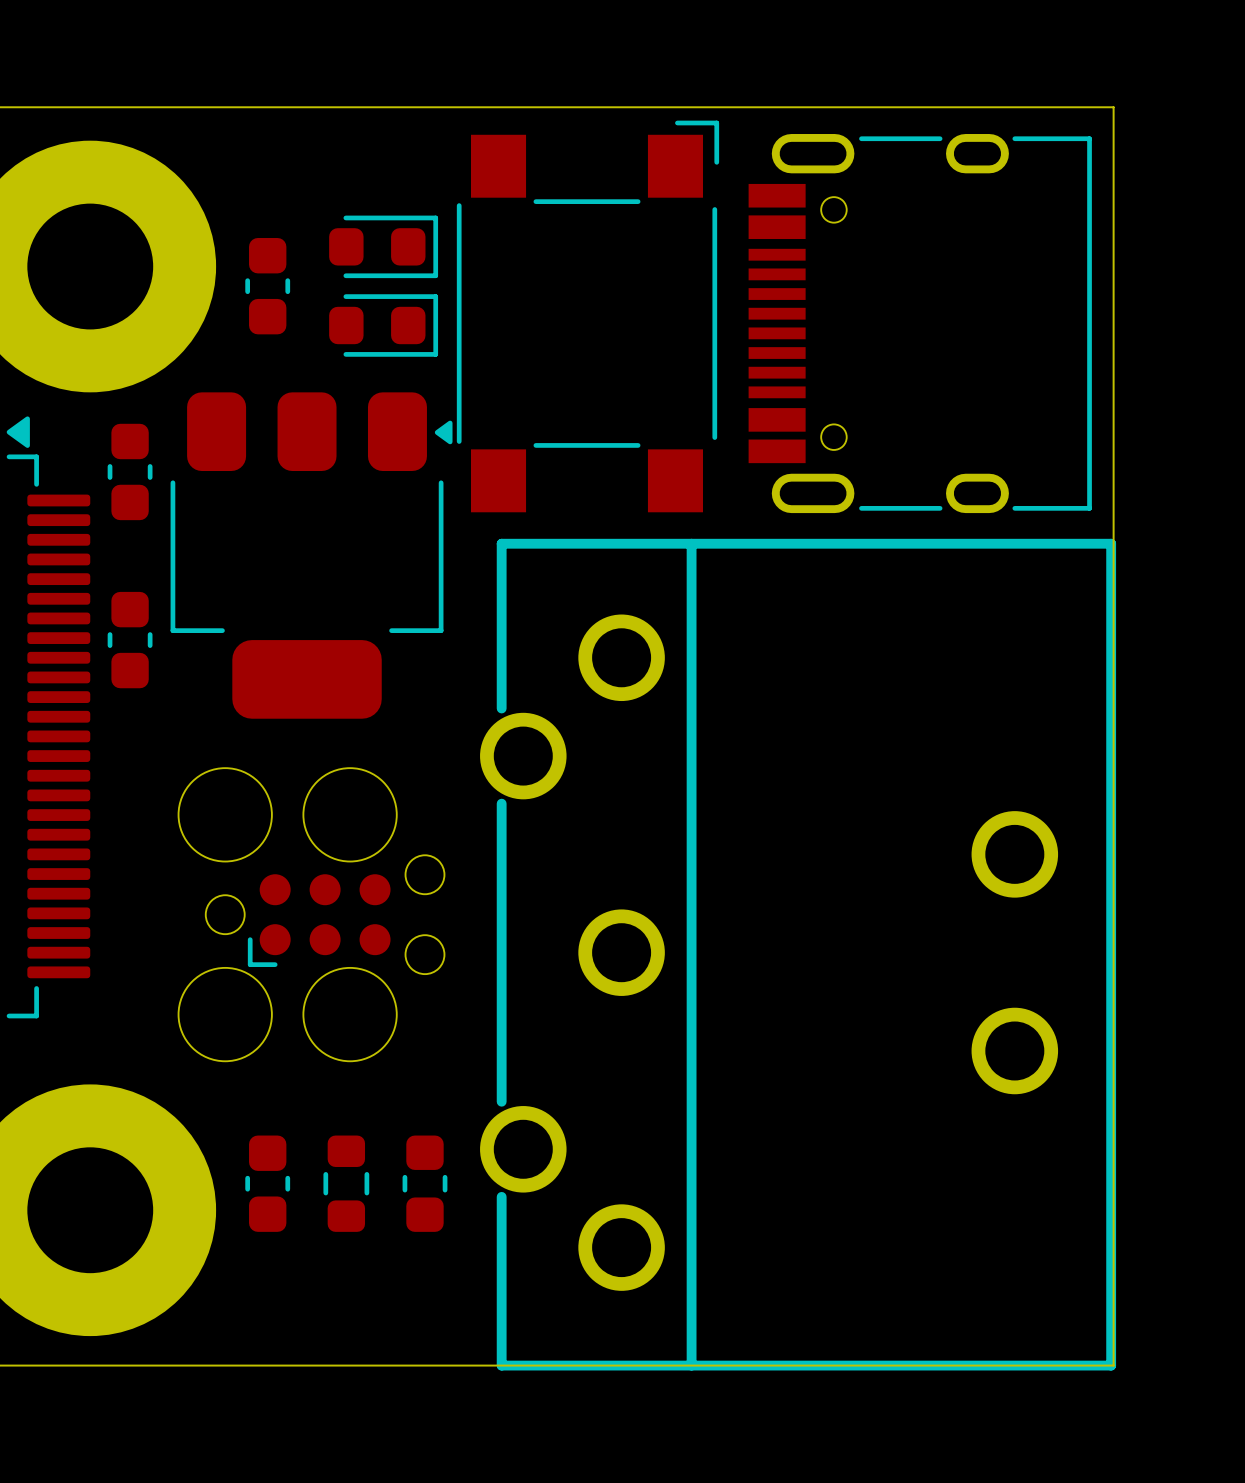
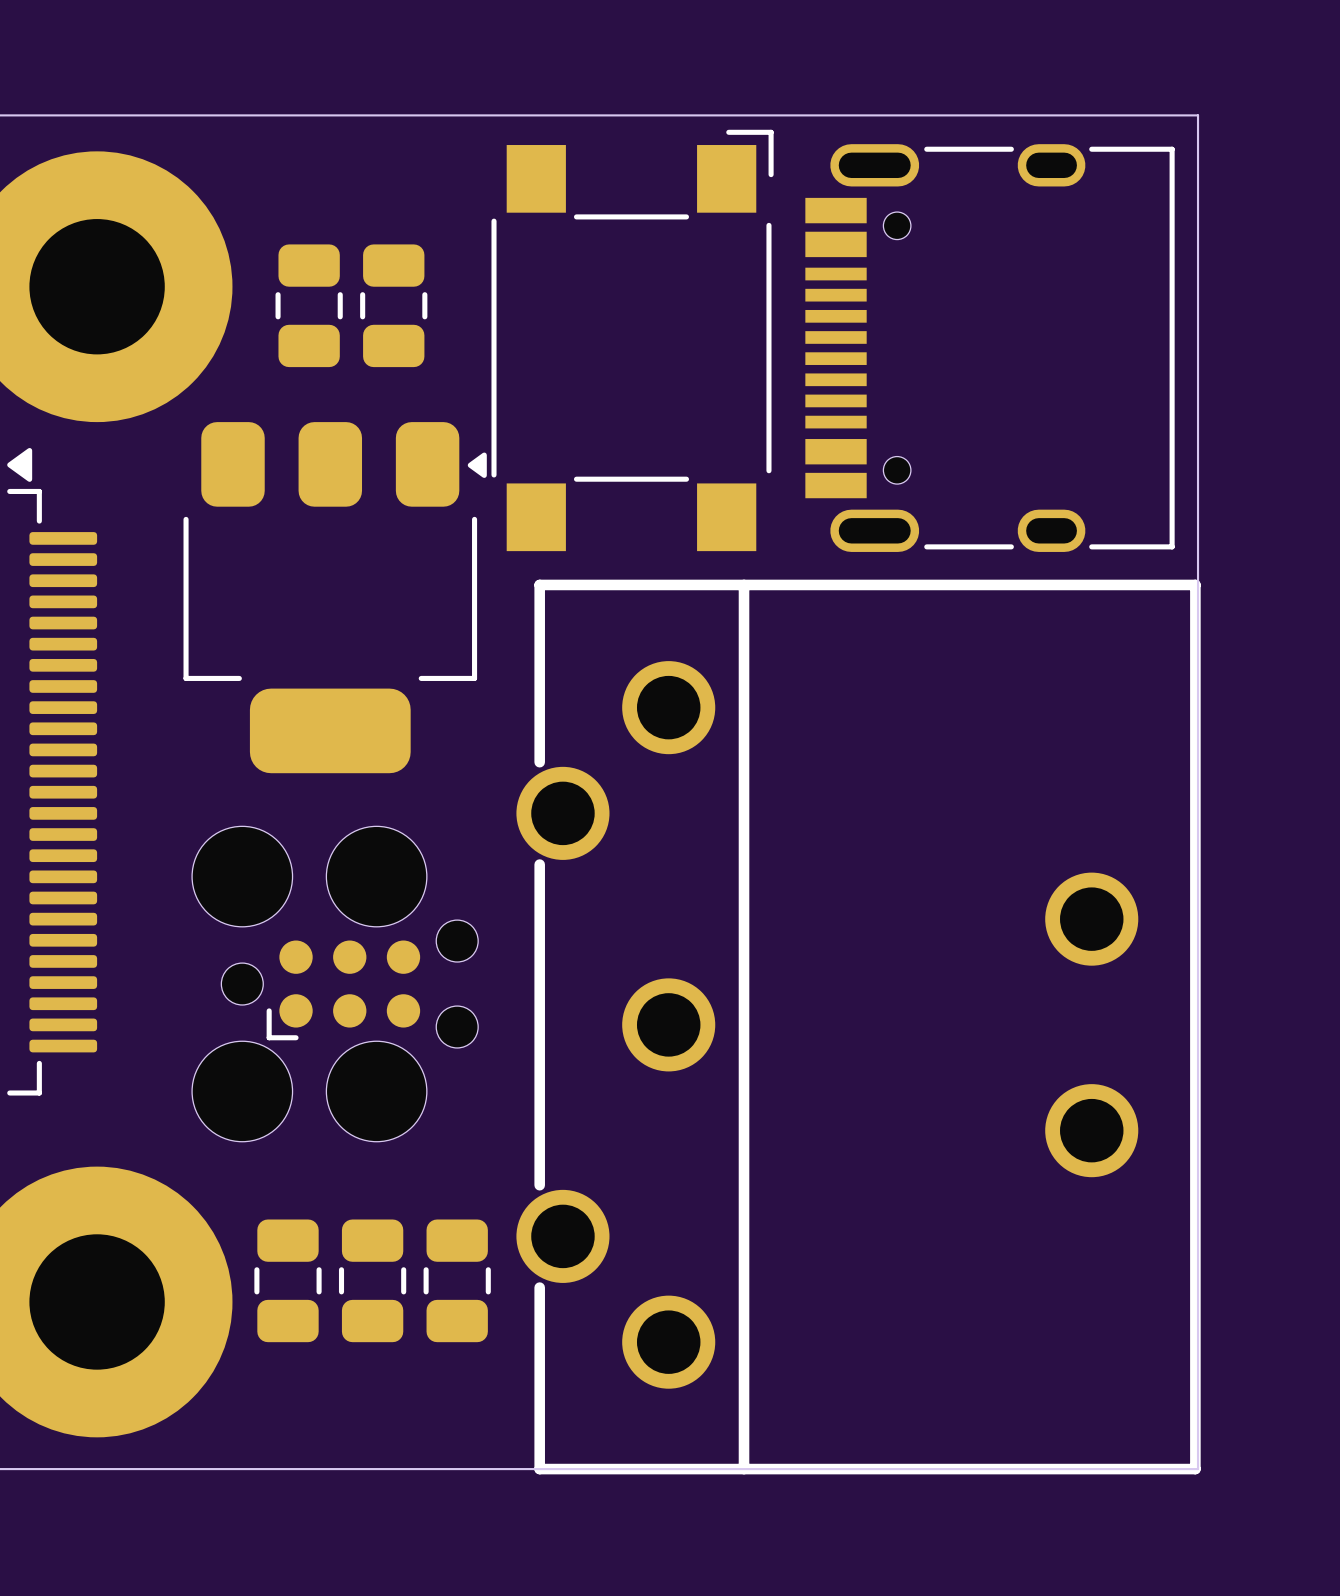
part footprint: [245, 238, 291, 335] -> [275, 244, 343, 368]
part: (383, 246) -> none
part: none -> (393, 305)
part: (383, 325) -> none
part: (130, 471) -> none
part: (130, 640) -> none
part footprint: [245, 1135, 291, 1232] -> [254, 1219, 322, 1343]
part footprint: [323, 1135, 370, 1232] -> [338, 1219, 407, 1343]
part footprint: [402, 1135, 448, 1232] -> [423, 1219, 491, 1343]

